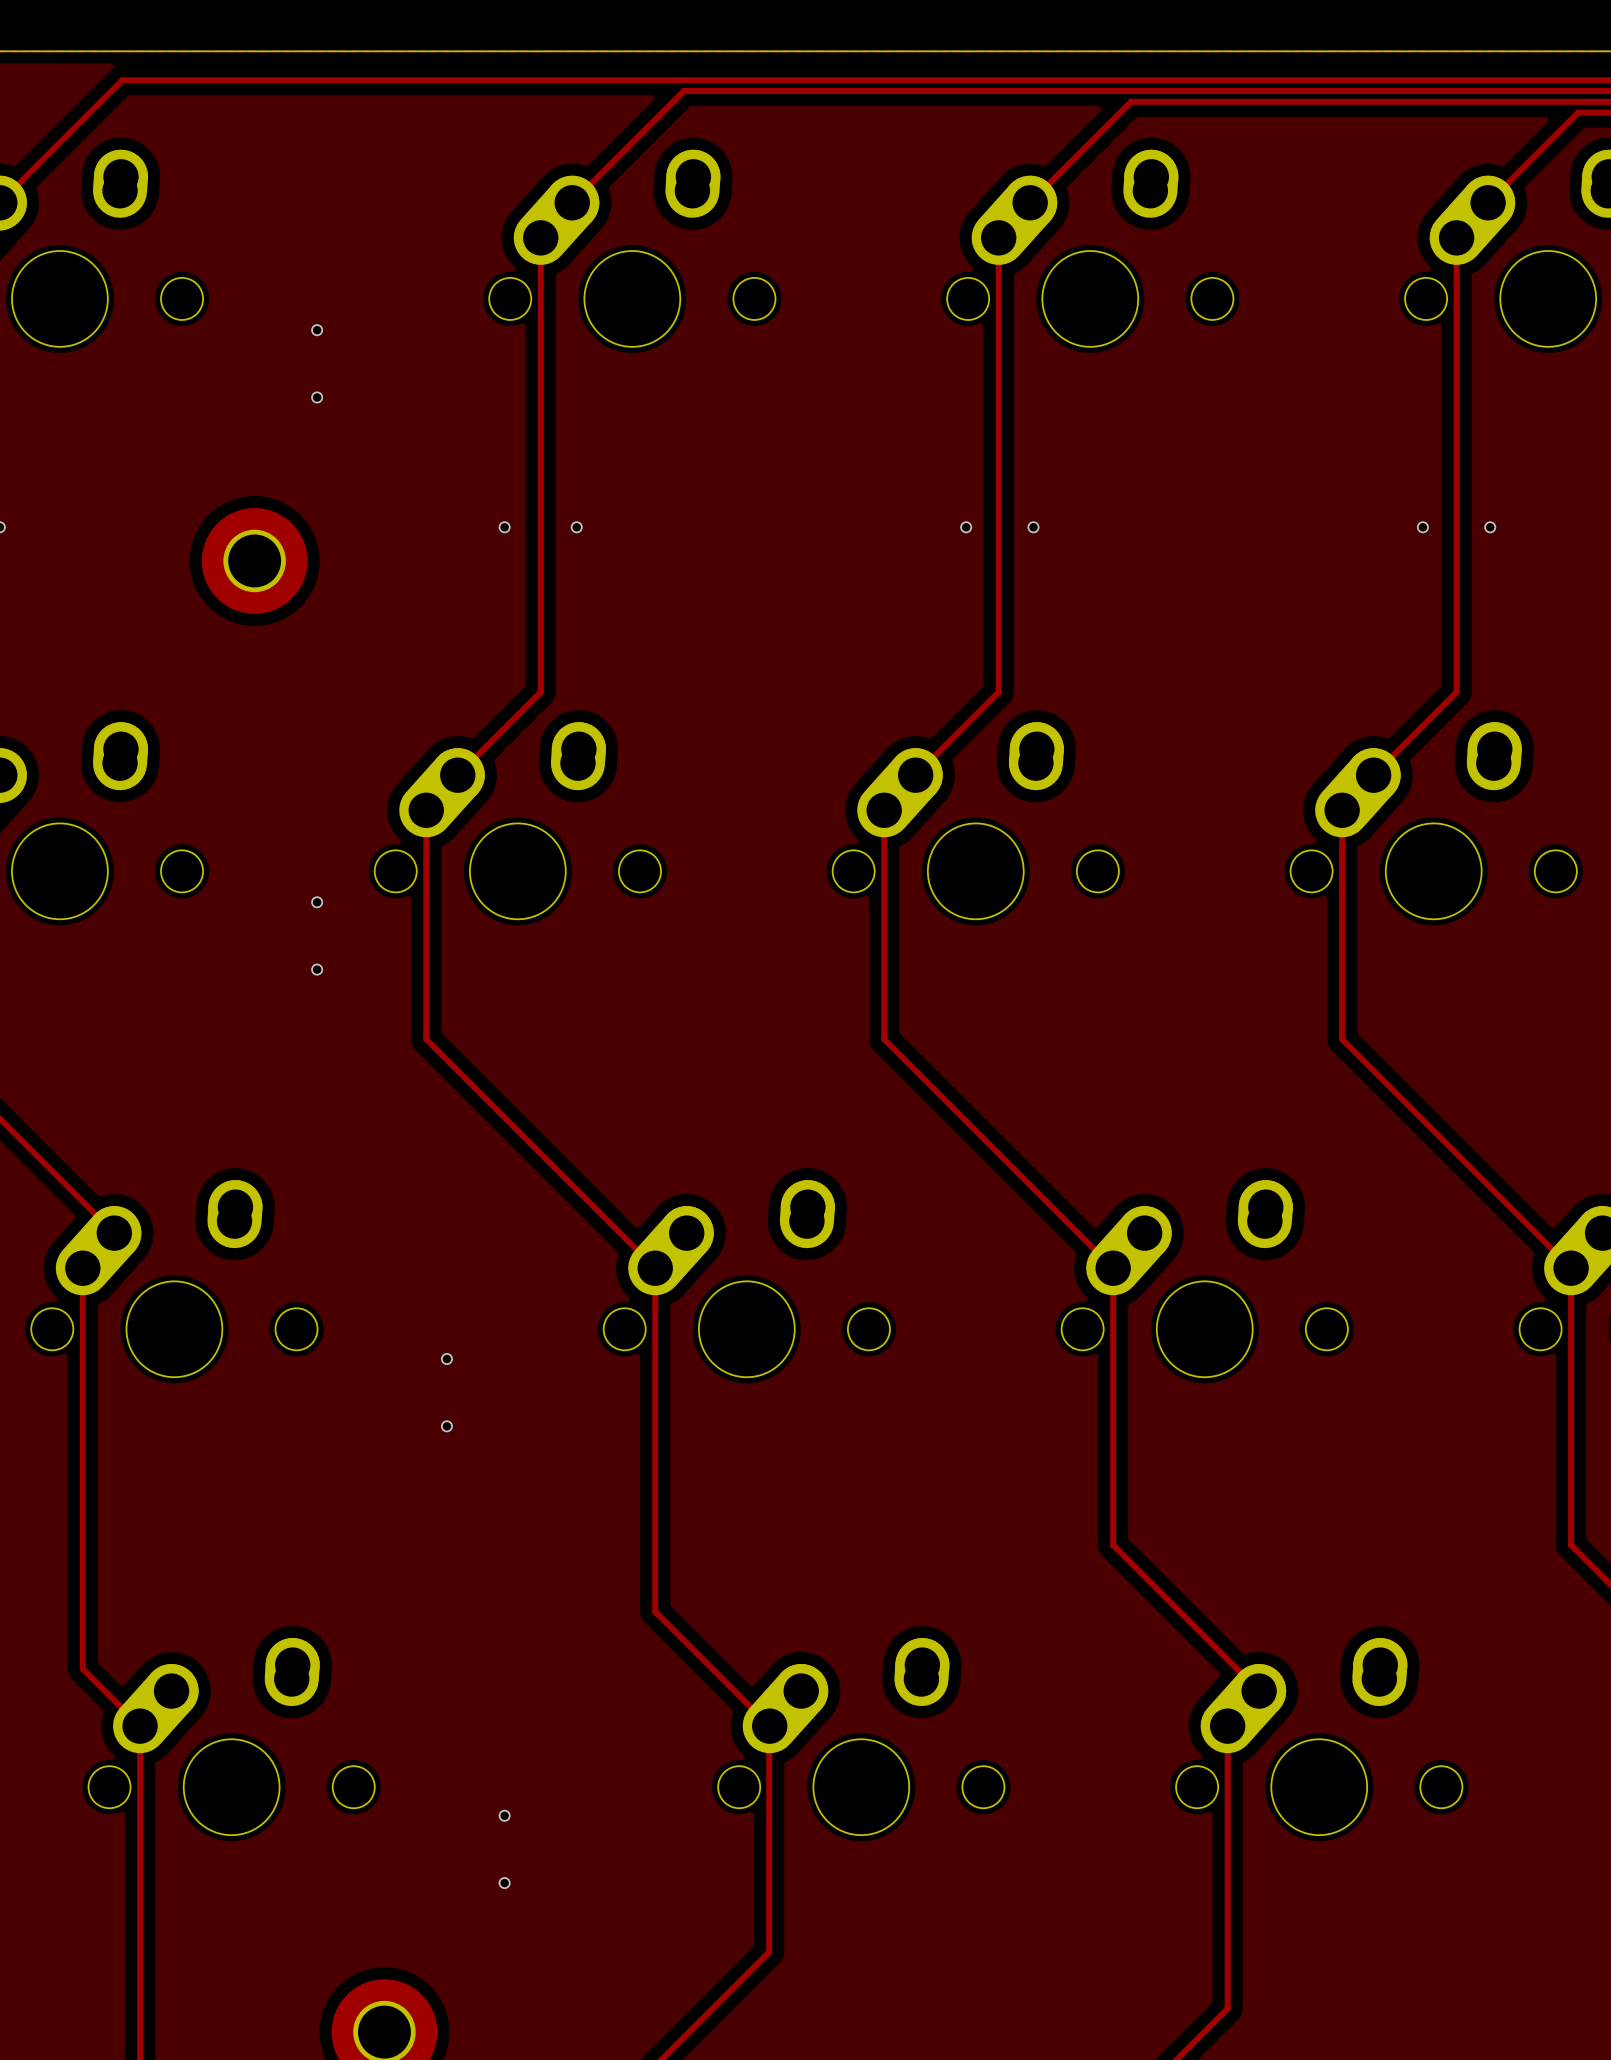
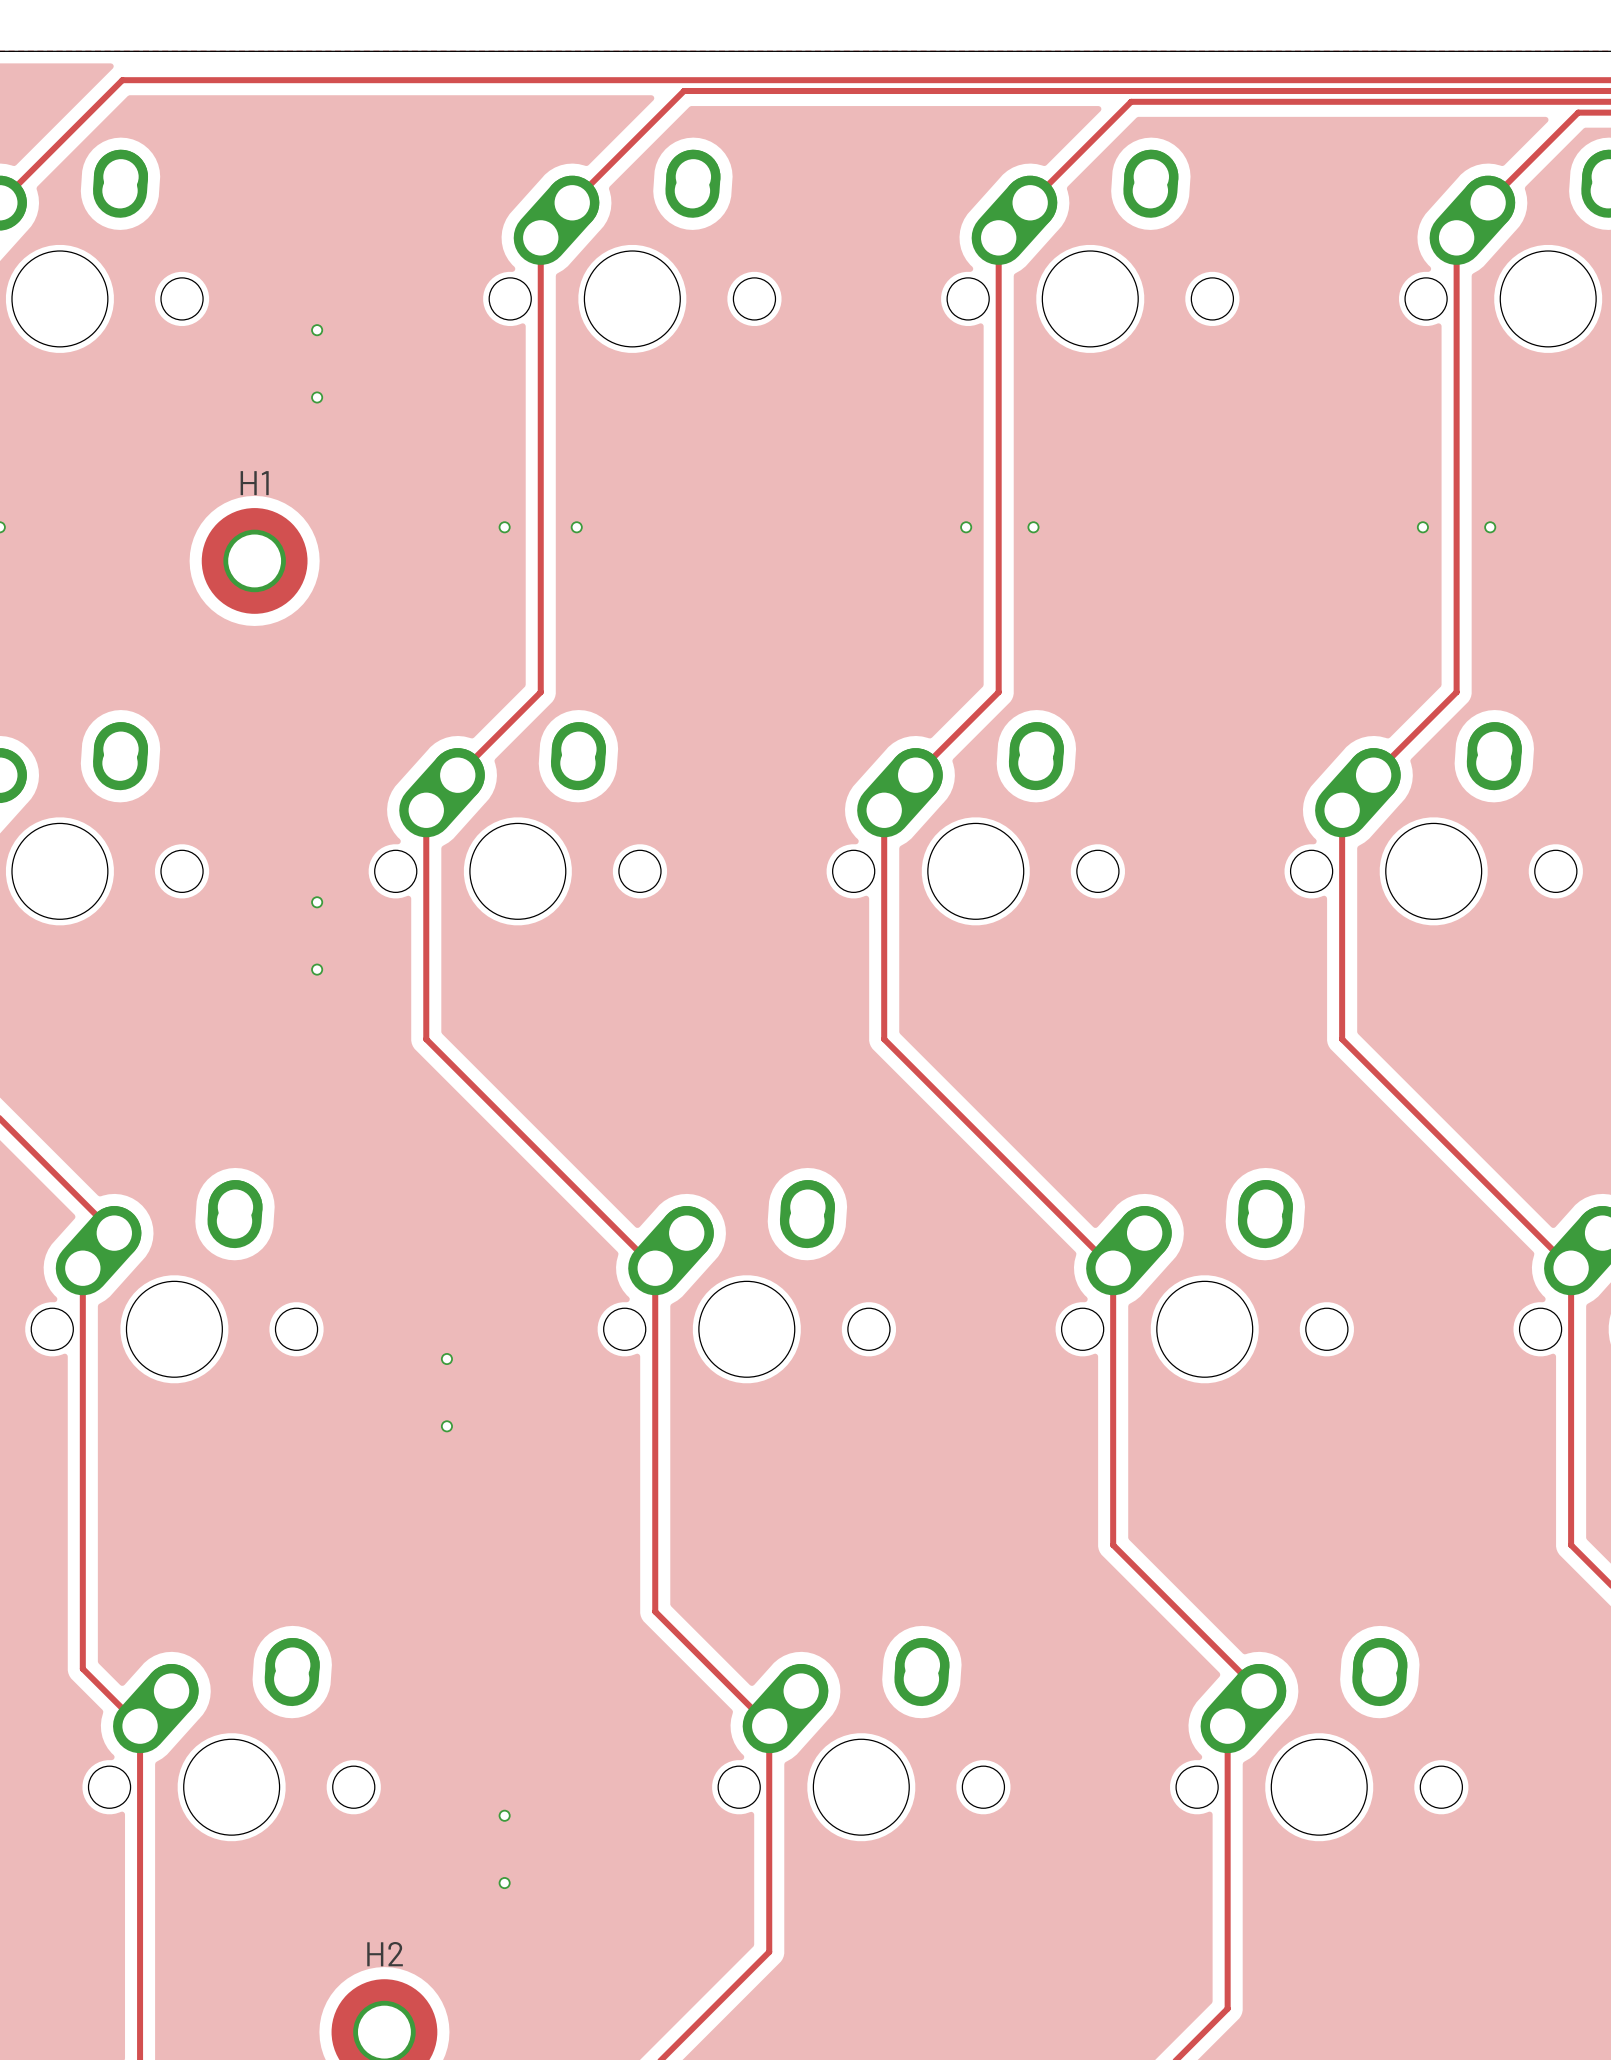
H1 name: none -> H1 (254, 483)
H2 name: none -> H2 (385, 1954)

